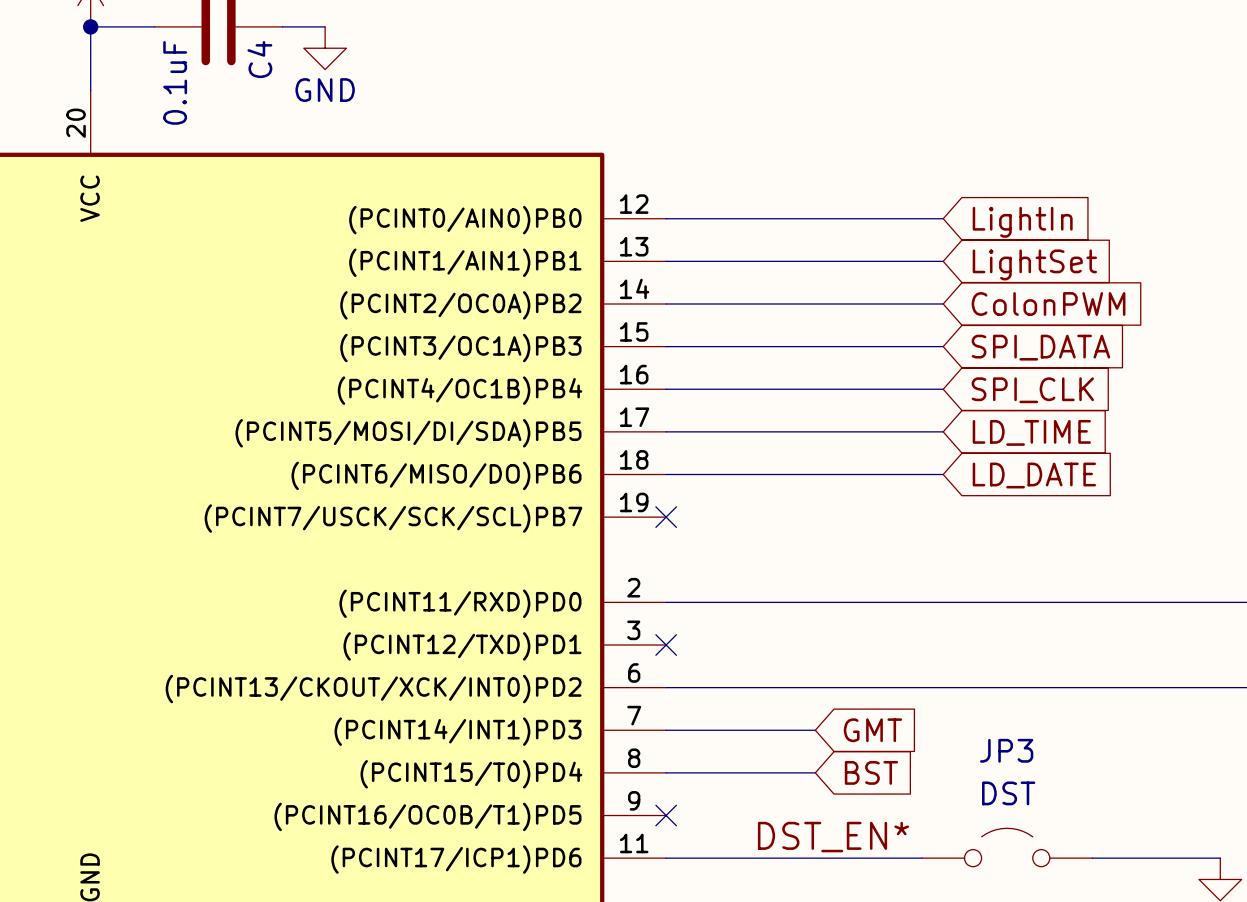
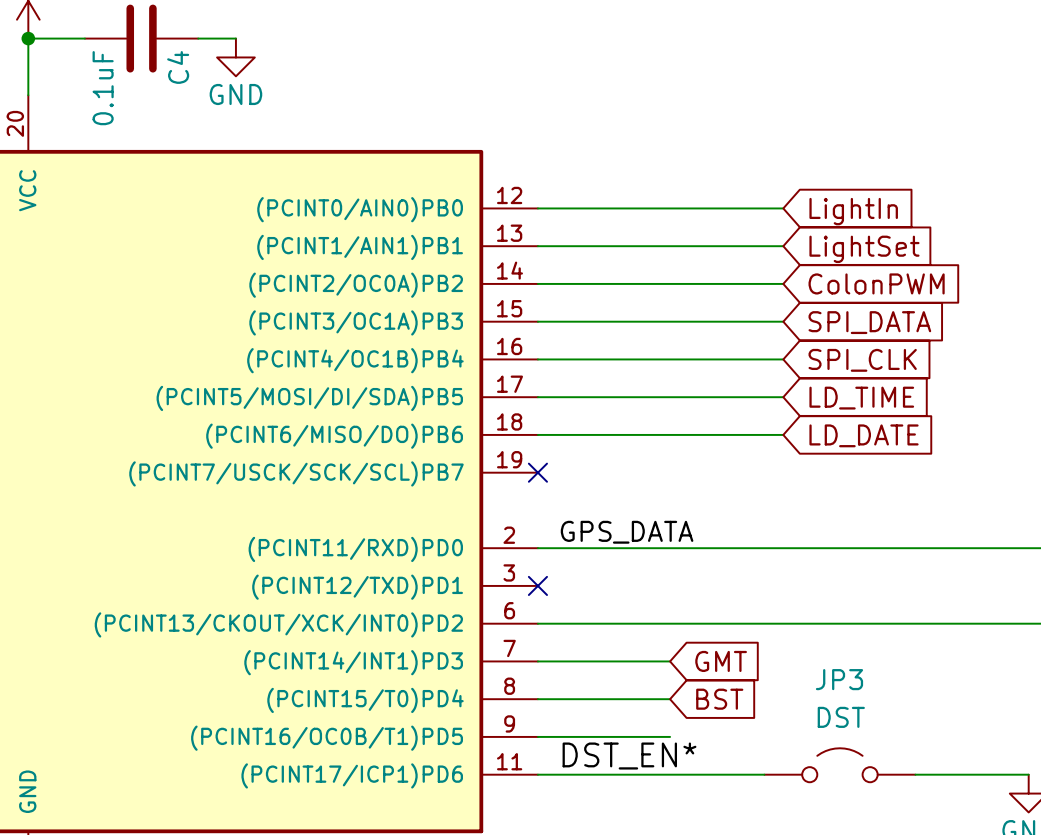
label: none -> GPS_DATA (627, 532)
wire: none -> (537, 736) (670, 736)
no-connect mark: (666, 815) -> none
label position: DST_EN* (833, 837) -> DST_EN* (629, 756)

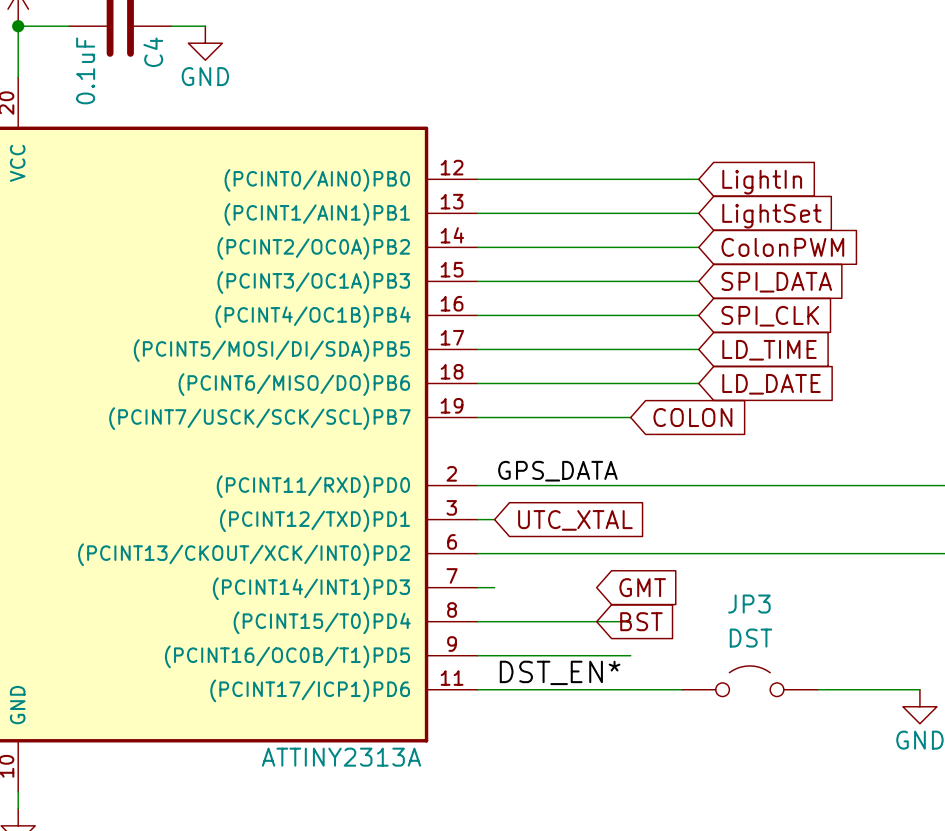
wire: none -> (477, 417) (630, 417)
no-connect mark: (537, 472) -> none
global label: none -> COLON (692, 417)
wire: none -> (477, 519) (494, 519)
no-connect mark: (537, 585) -> none
global label: none -> UTC_XTAL (575, 520)
wire: (556, 661) (670, 661) -> none
wire: none -> (596, 621) (630, 621)
wire: none -> (596, 655) (630, 655)

